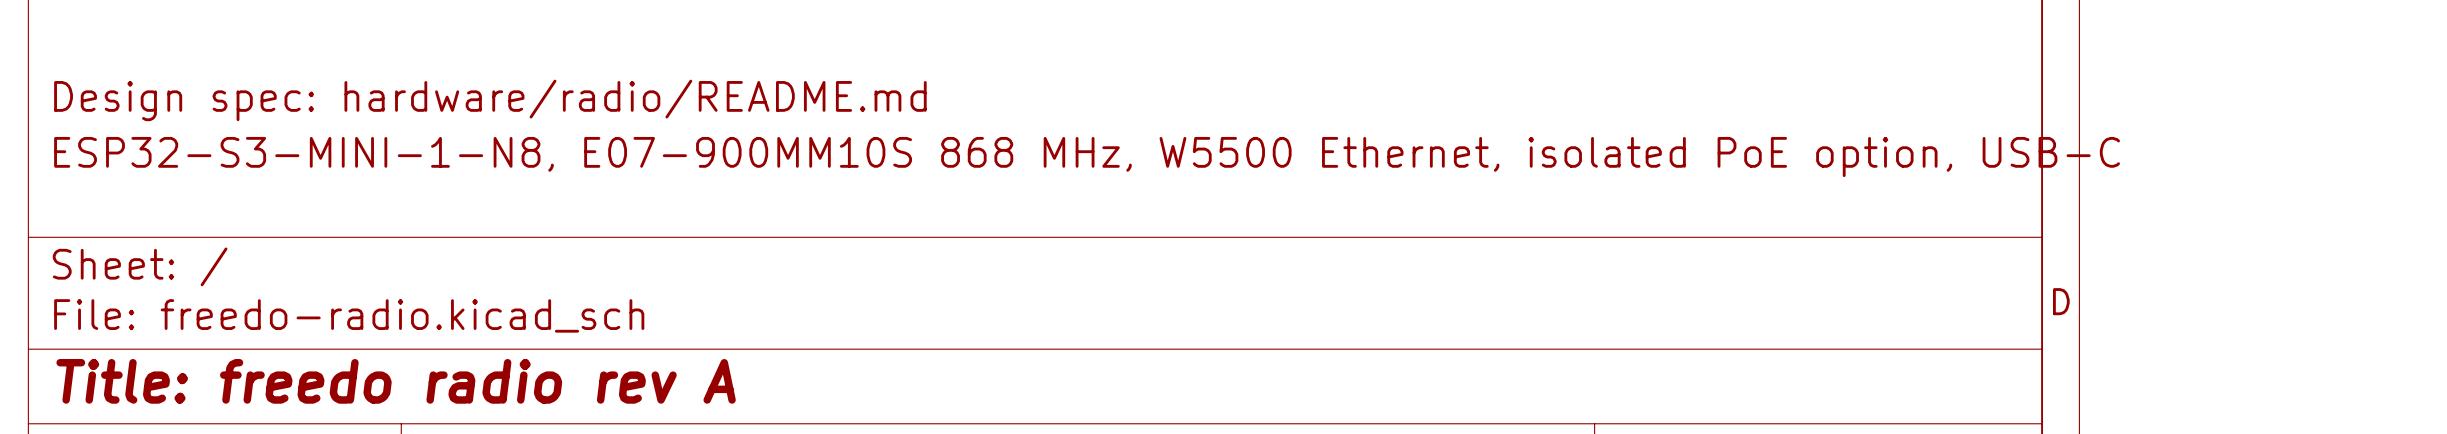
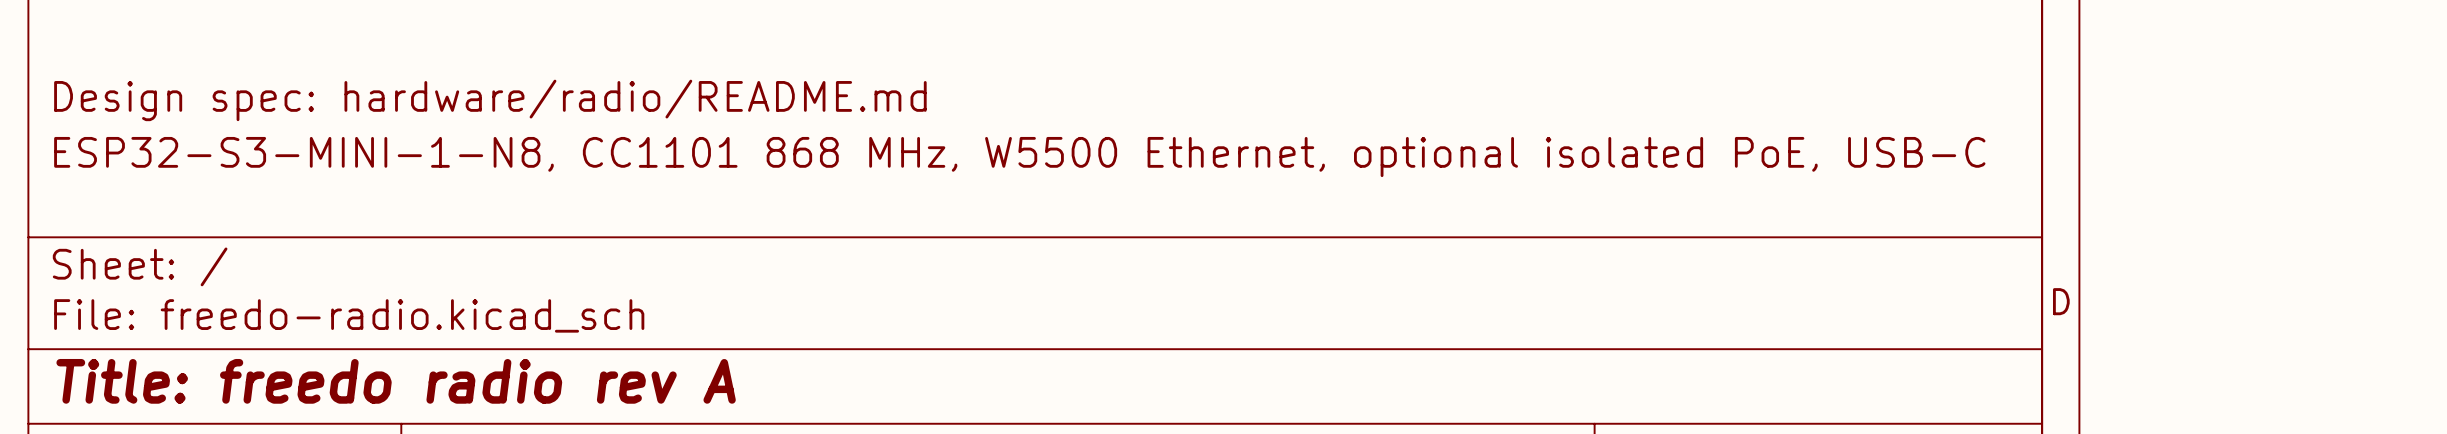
title block: ESP32-S3-MINI-1-N8, E07-900MM10S 868 MHz, W5500 Ethernet, isolated PoE option, USB-C (1087, 157) -> ESP32-S3-MINI-1-N8, CC1101 868 MHz, W5500 Ethernet, optional isolated PoE, USB-C (1019, 157)

